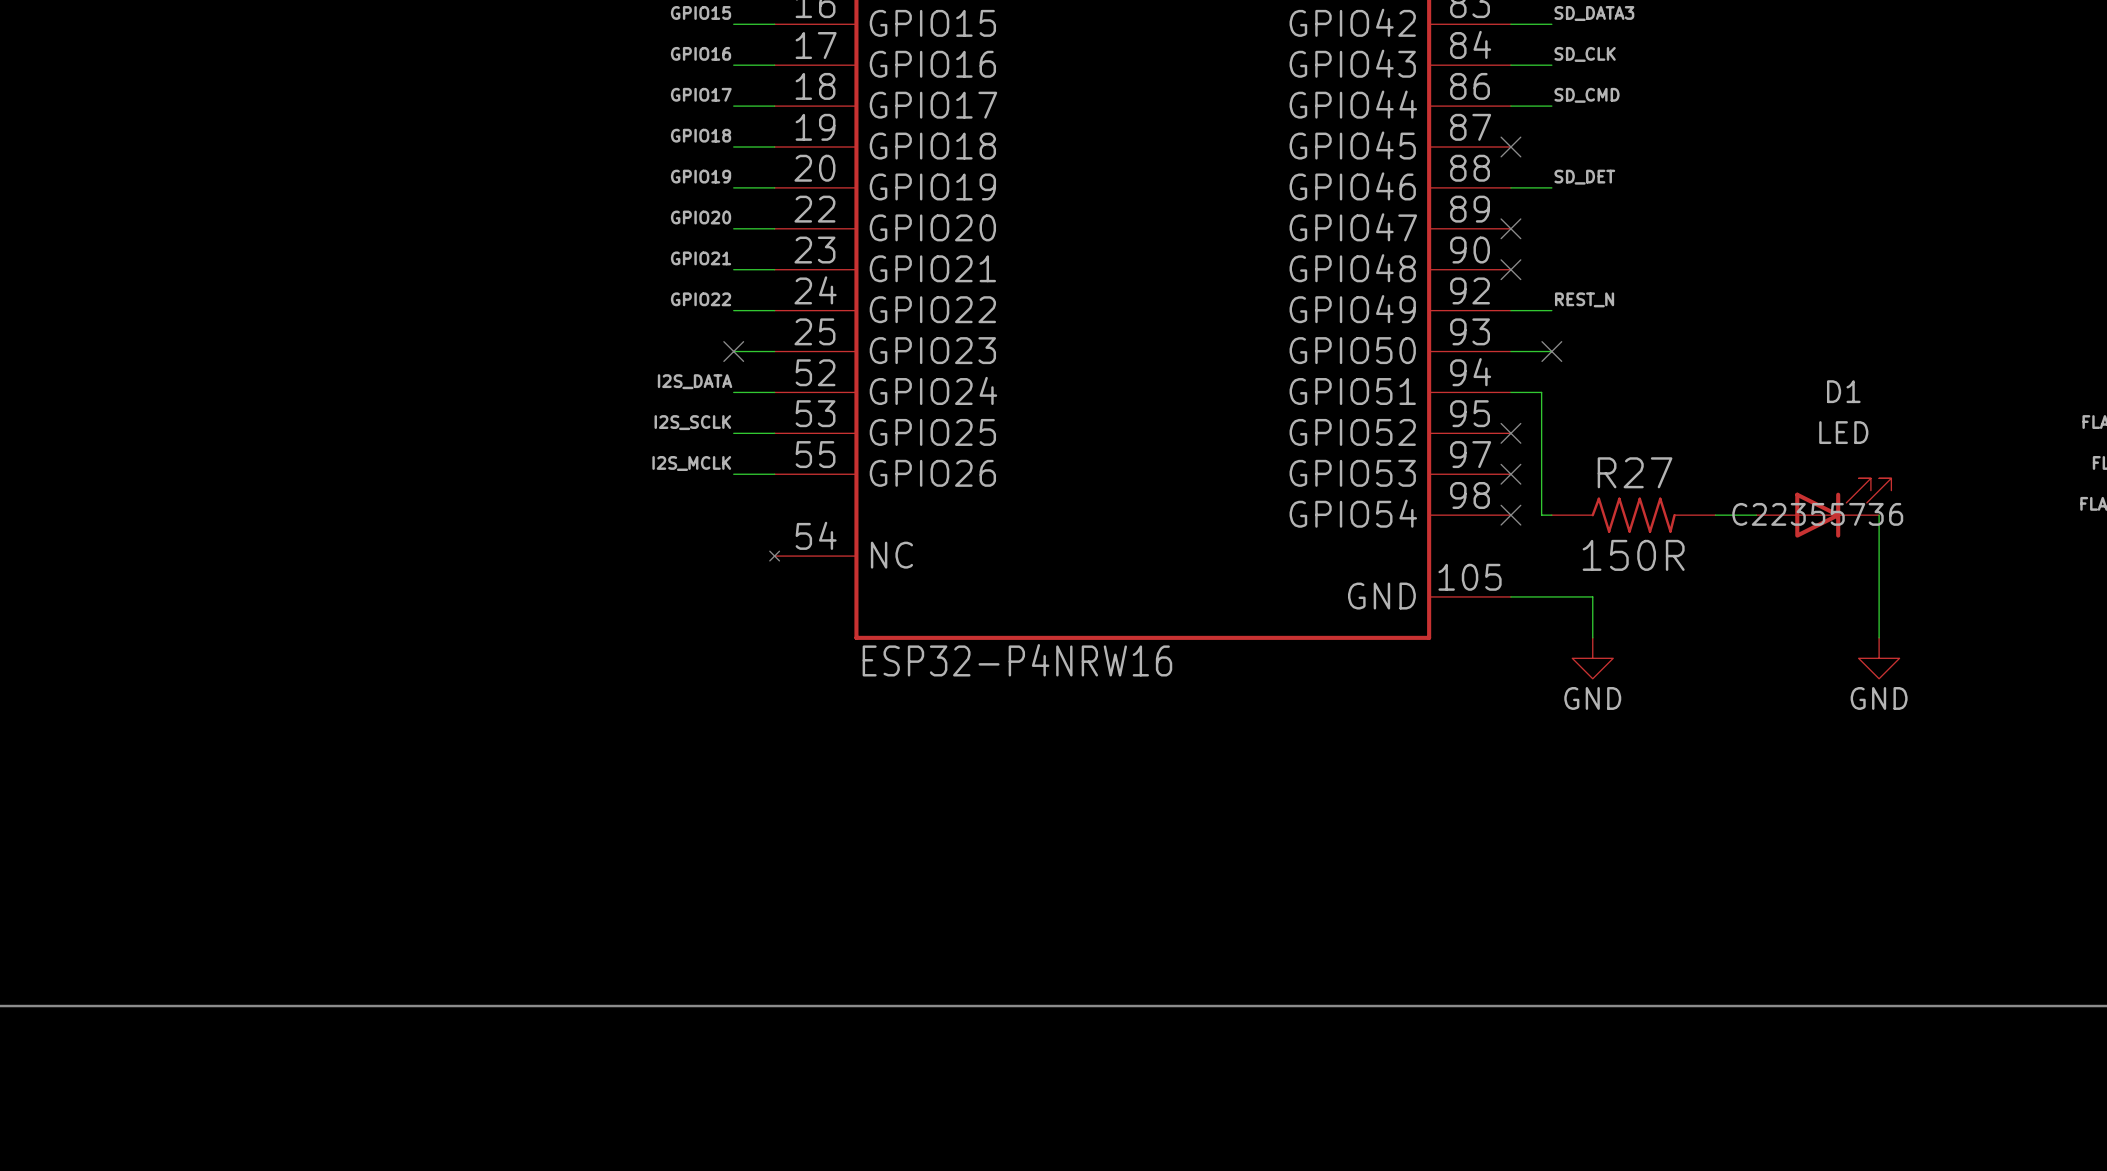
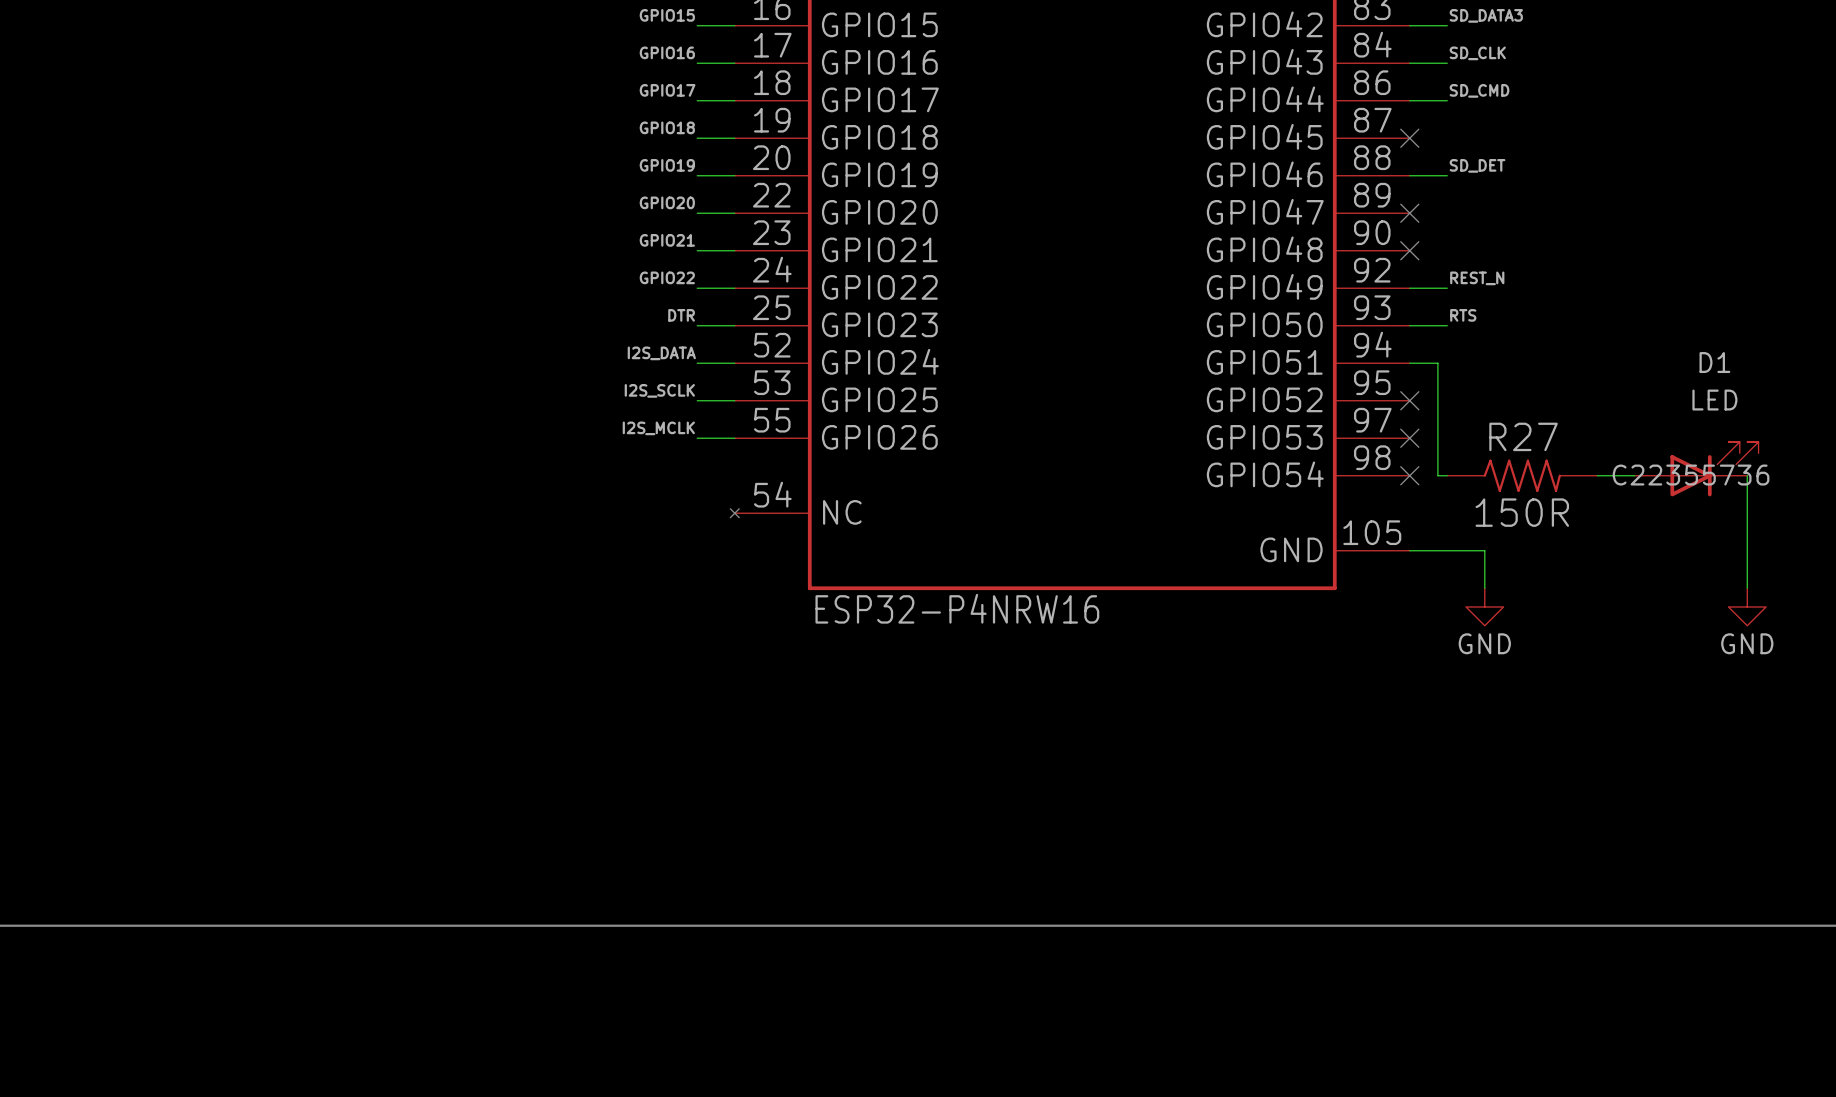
label: none -> DTR (681, 315)
label: none -> RTS (1463, 315)
no-connect mark: (733, 351) -> none
no-connect mark: (1551, 351) -> none

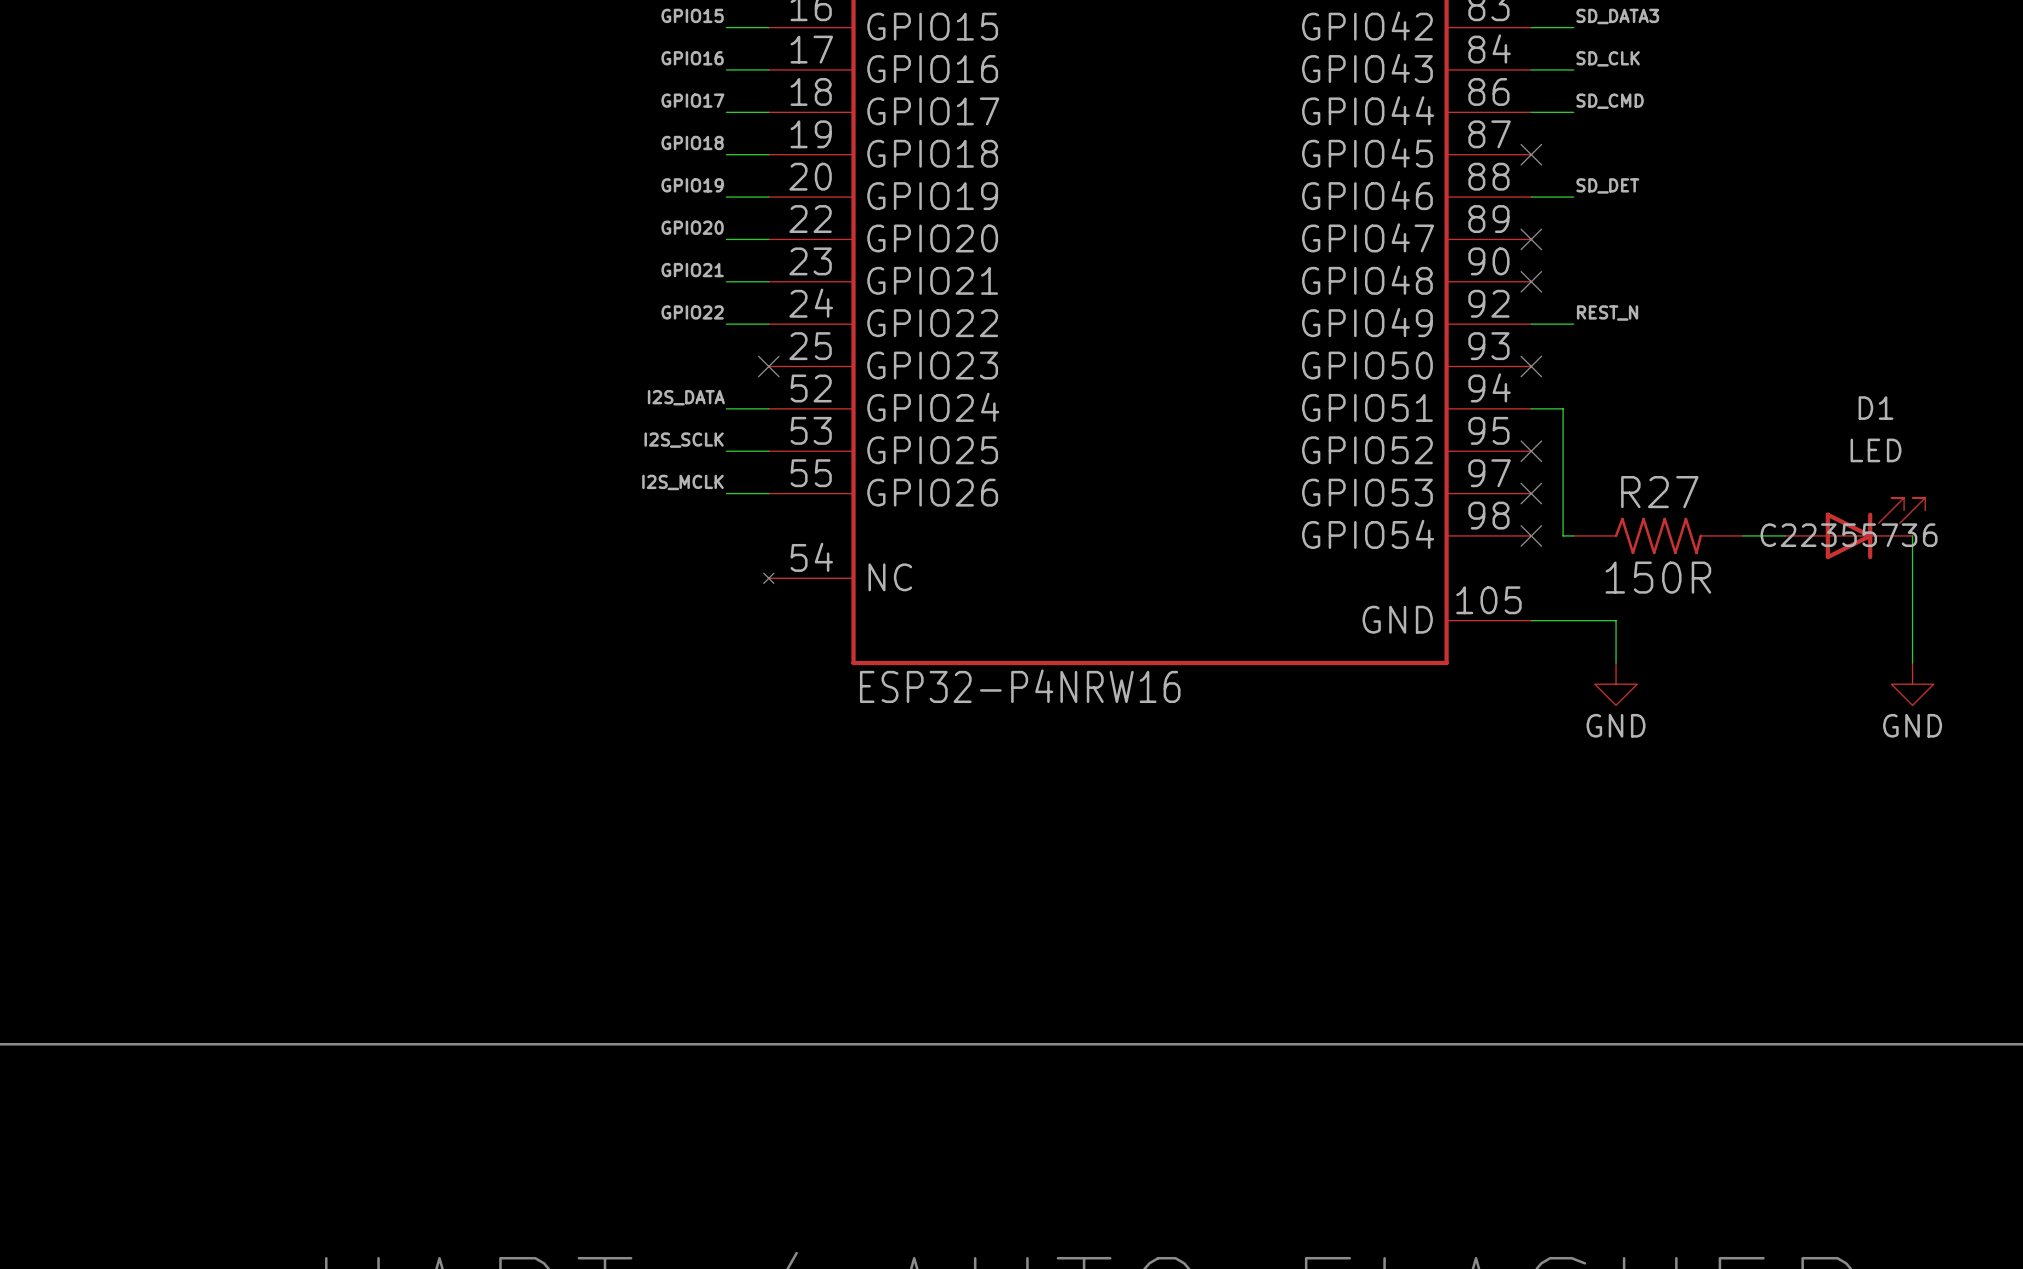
label: DTR (681, 315) -> none
label: RTS (1463, 315) -> none
wire: (697, 325) (734, 325) -> none
no-connect mark: none -> (768, 366)
wire: (1409, 325) (1447, 325) -> none
no-connect mark: none -> (1531, 366)

